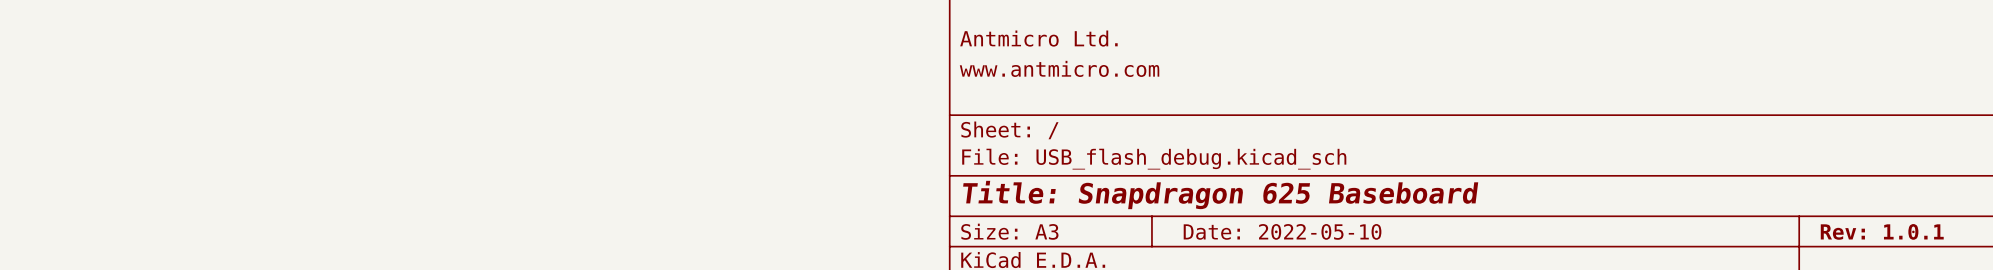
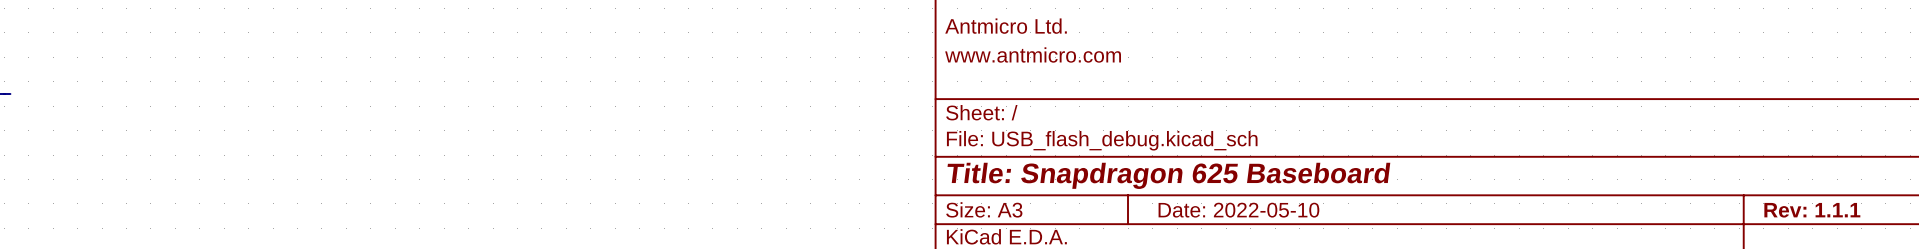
title block: Rev: 1.0.1 (1882, 231) -> Rev: 1.1.1 (1812, 210)

